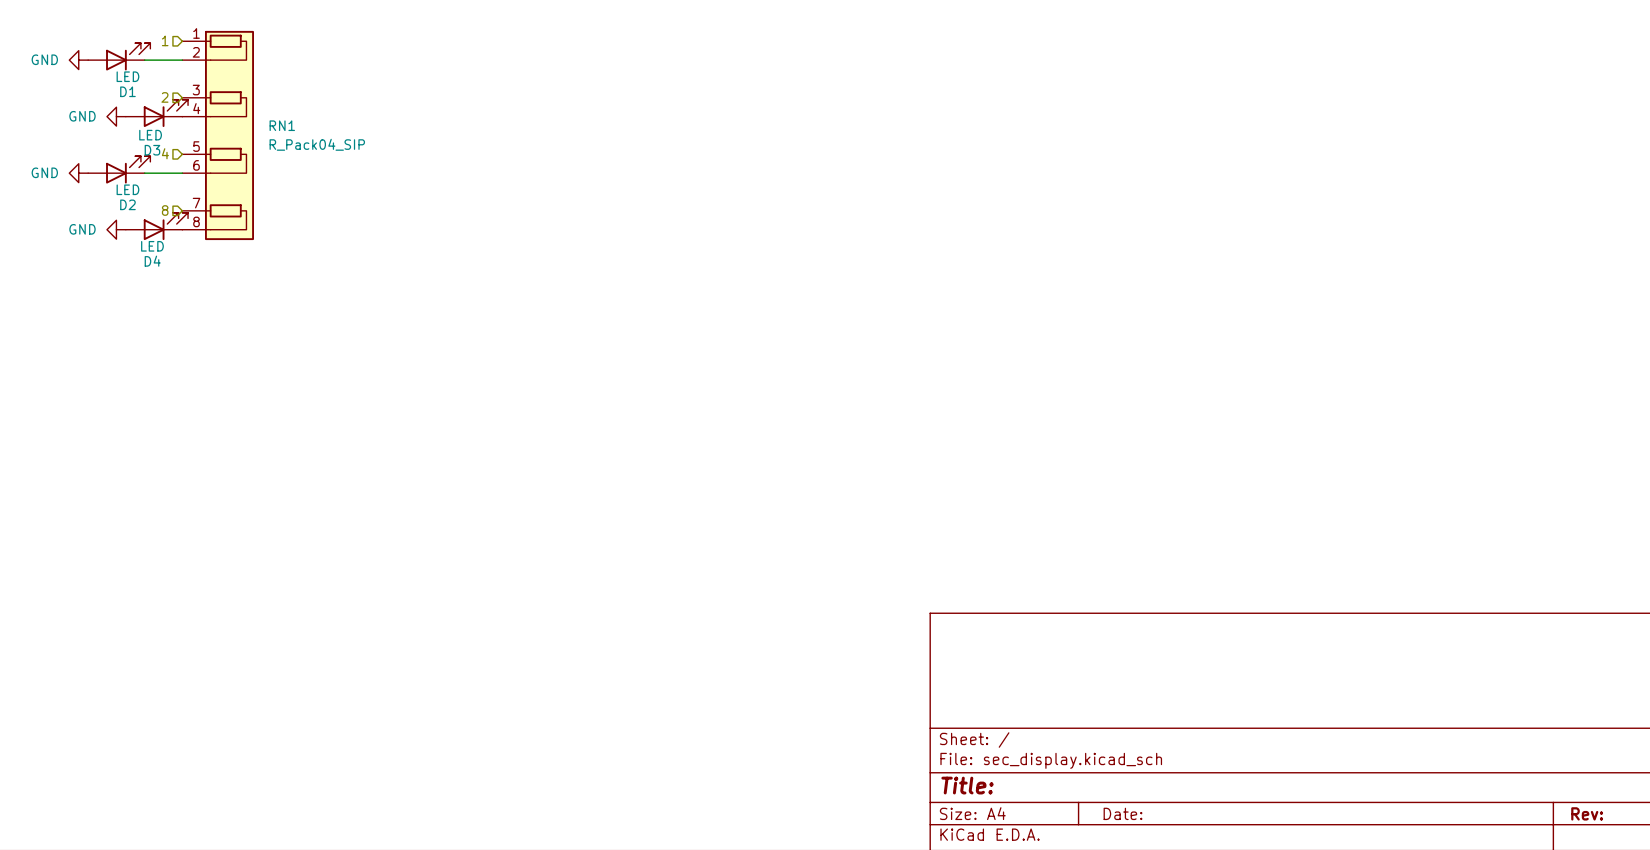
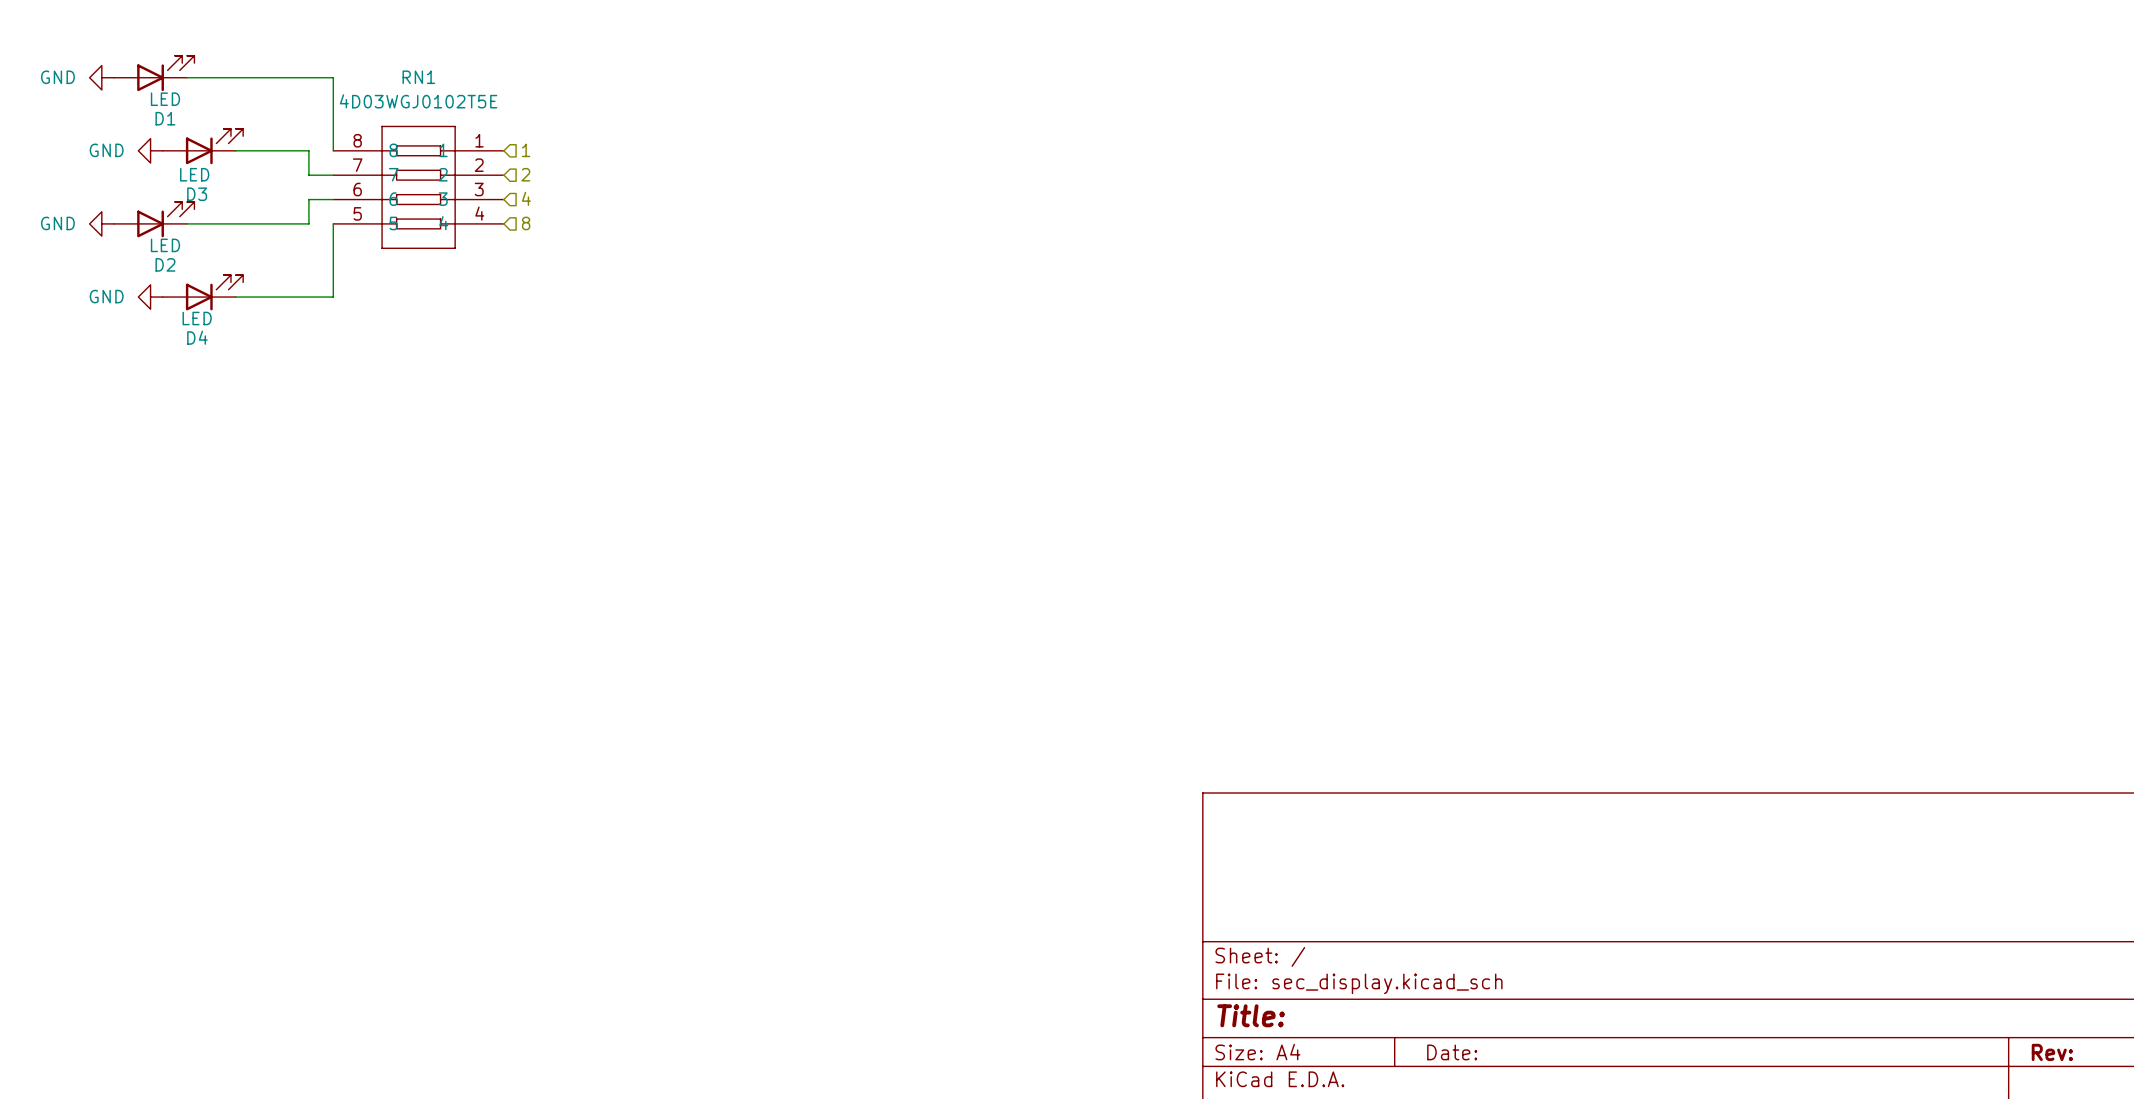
RN1 symbol: [182, 30, 254, 241] -> [333, 126, 504, 249]
hierarchical label: 1 (165, 40) -> none
wire: none -> (235, 77) (333, 77) (333, 150)
hierarchical label: 2 (164, 97) -> none
hierarchical label: none -> 1 (526, 150)
RN1 name position: RN1 (282, 125) -> RN1 (418, 77)
hierarchical label: none -> 2 (525, 174)
RN1 value: R_Pack04_SIP (317, 144) -> 4D03WGJ0102T5E (418, 101)
hierarchical label: 4 (165, 153) -> none
hierarchical label: none -> 4 (526, 198)
hierarchical label: none -> 8 (526, 223)
wire: none -> (333, 223) (333, 297) (235, 297)
hierarchical label: 8 (165, 210) -> none

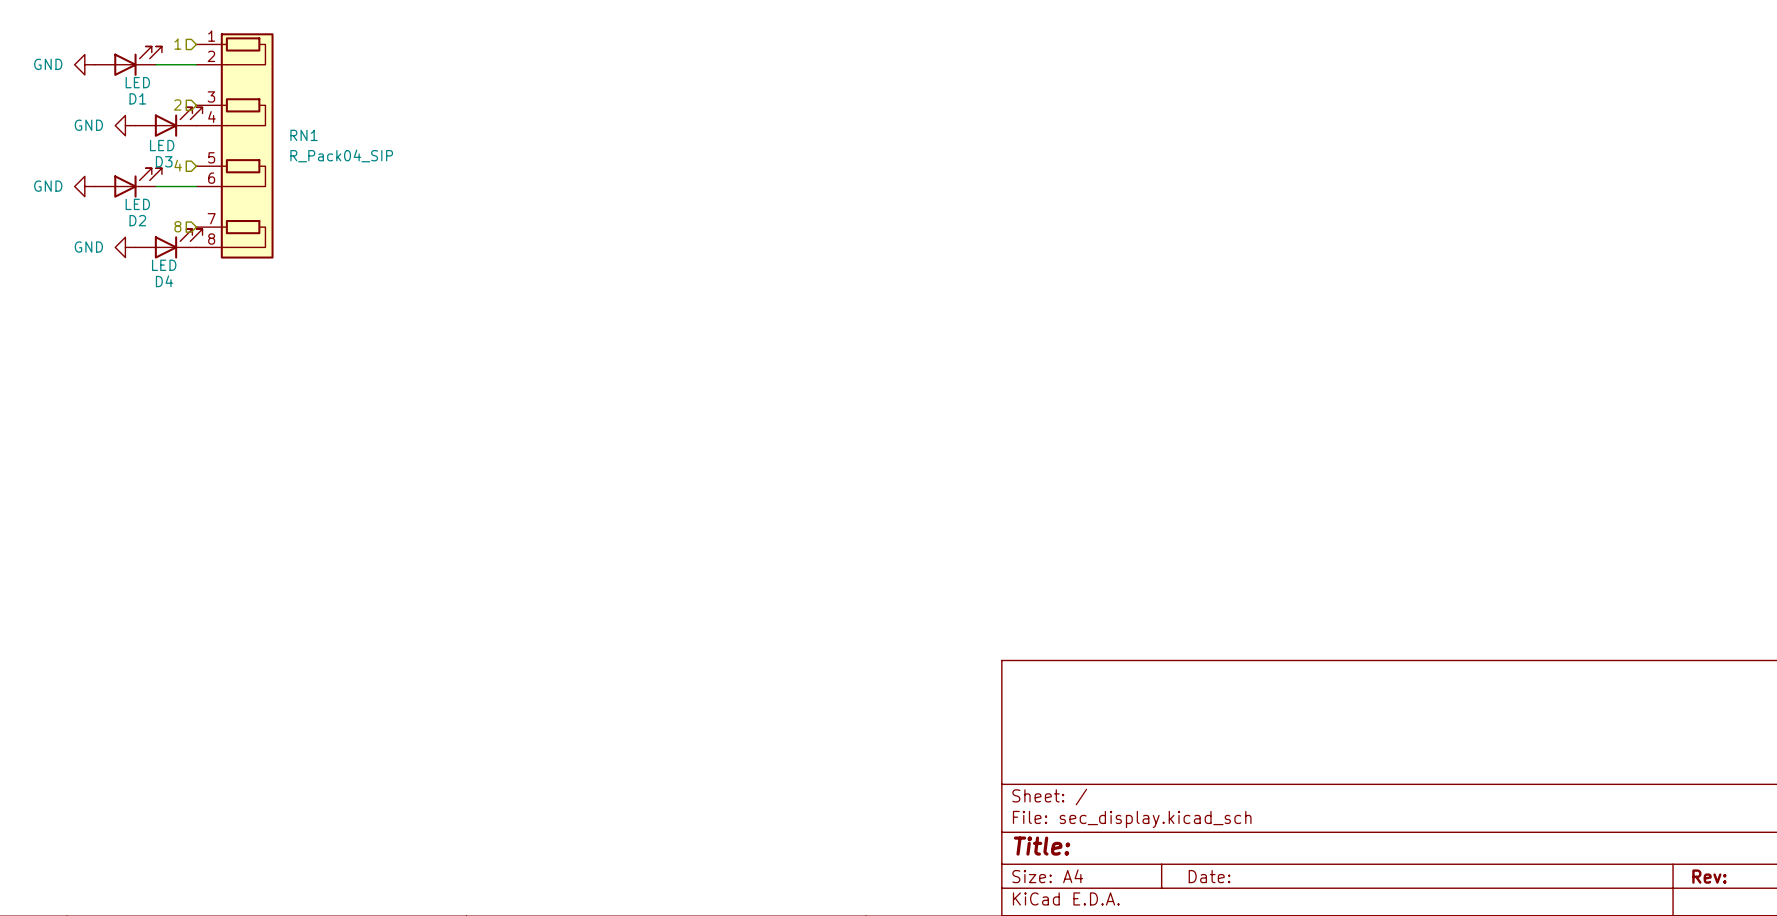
hierarchical label: none -> 1 (177, 44)
wire: (235, 77) (333, 77) (333, 150) -> none
RN1 name position: RN1 (418, 77) -> RN1 (304, 135)
RN1 value: 4D03WGJ0102T5E (418, 101) -> R_Pack04_SIP (341, 155)
hierarchical label: none -> 2 (177, 104)
RN1 symbol: [333, 126, 504, 249] -> [196, 33, 274, 259]
hierarchical label: 1 (526, 150) -> none
hierarchical label: 2 (525, 174) -> none
hierarchical label: none -> 4 (178, 165)
hierarchical label: 4 (526, 198) -> none
wire: (333, 223) (333, 297) (235, 297) -> none
hierarchical label: 8 (526, 223) -> none
hierarchical label: none -> 8 (177, 226)

